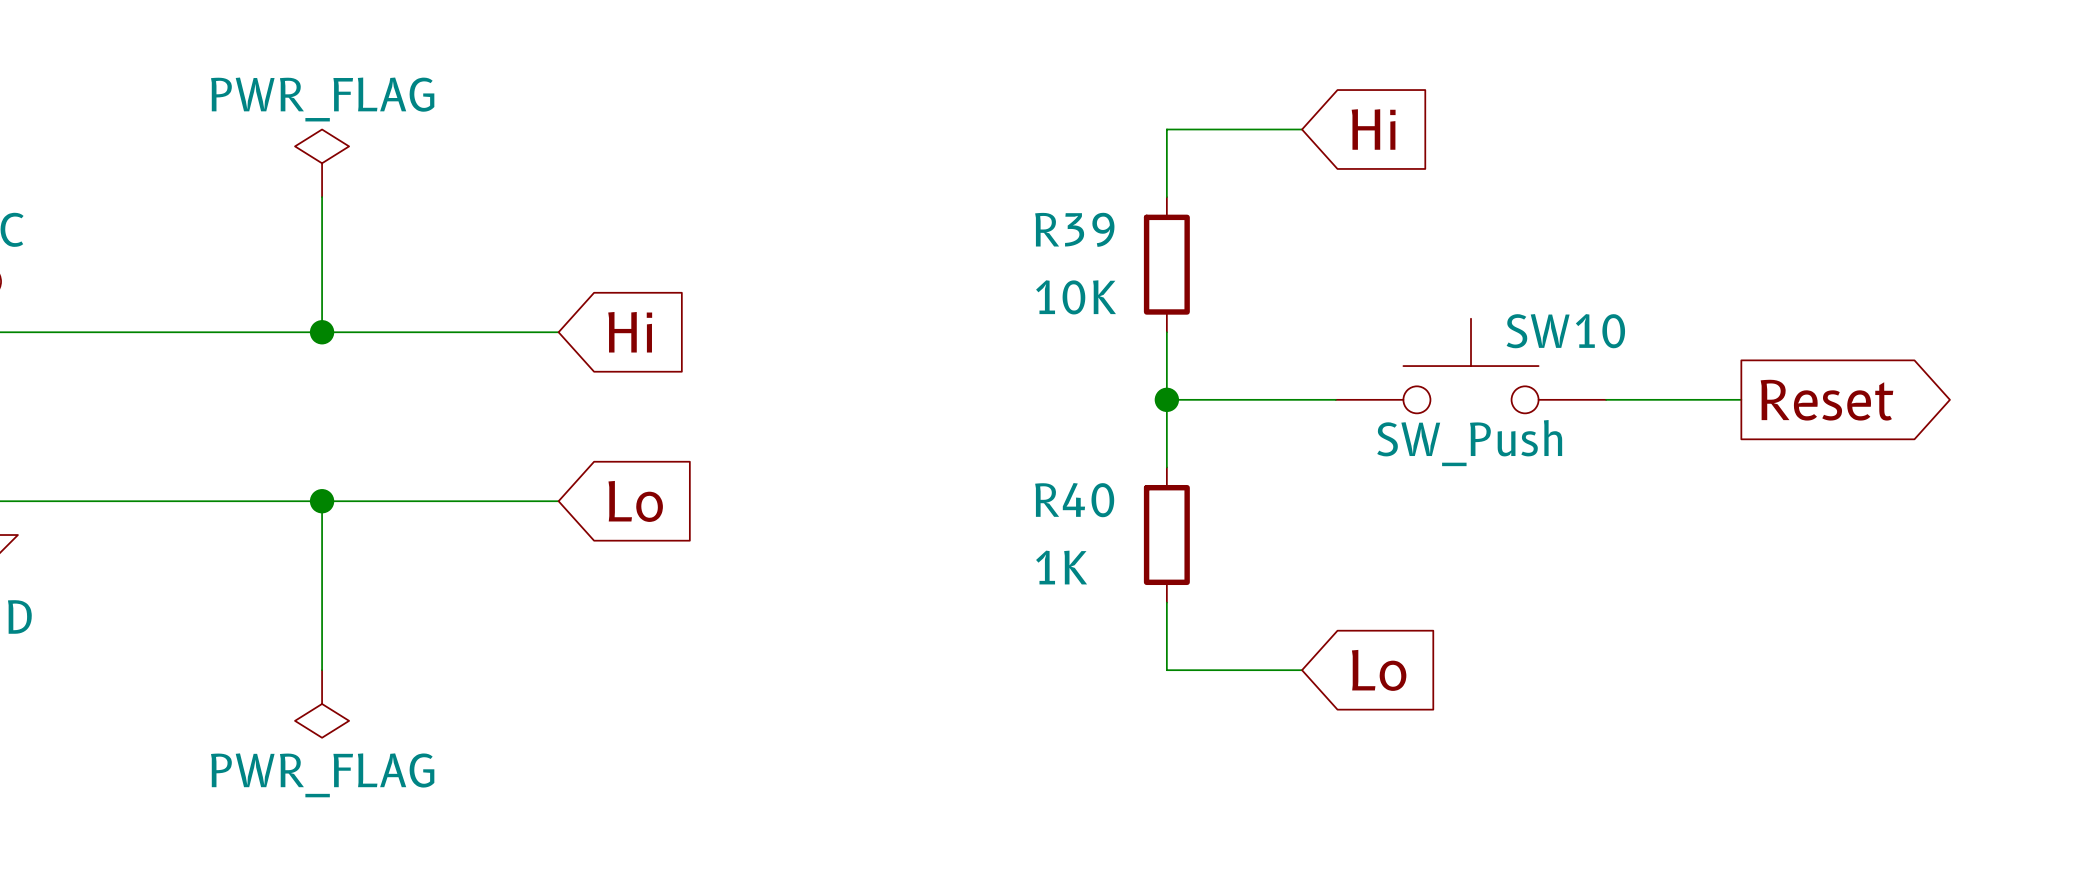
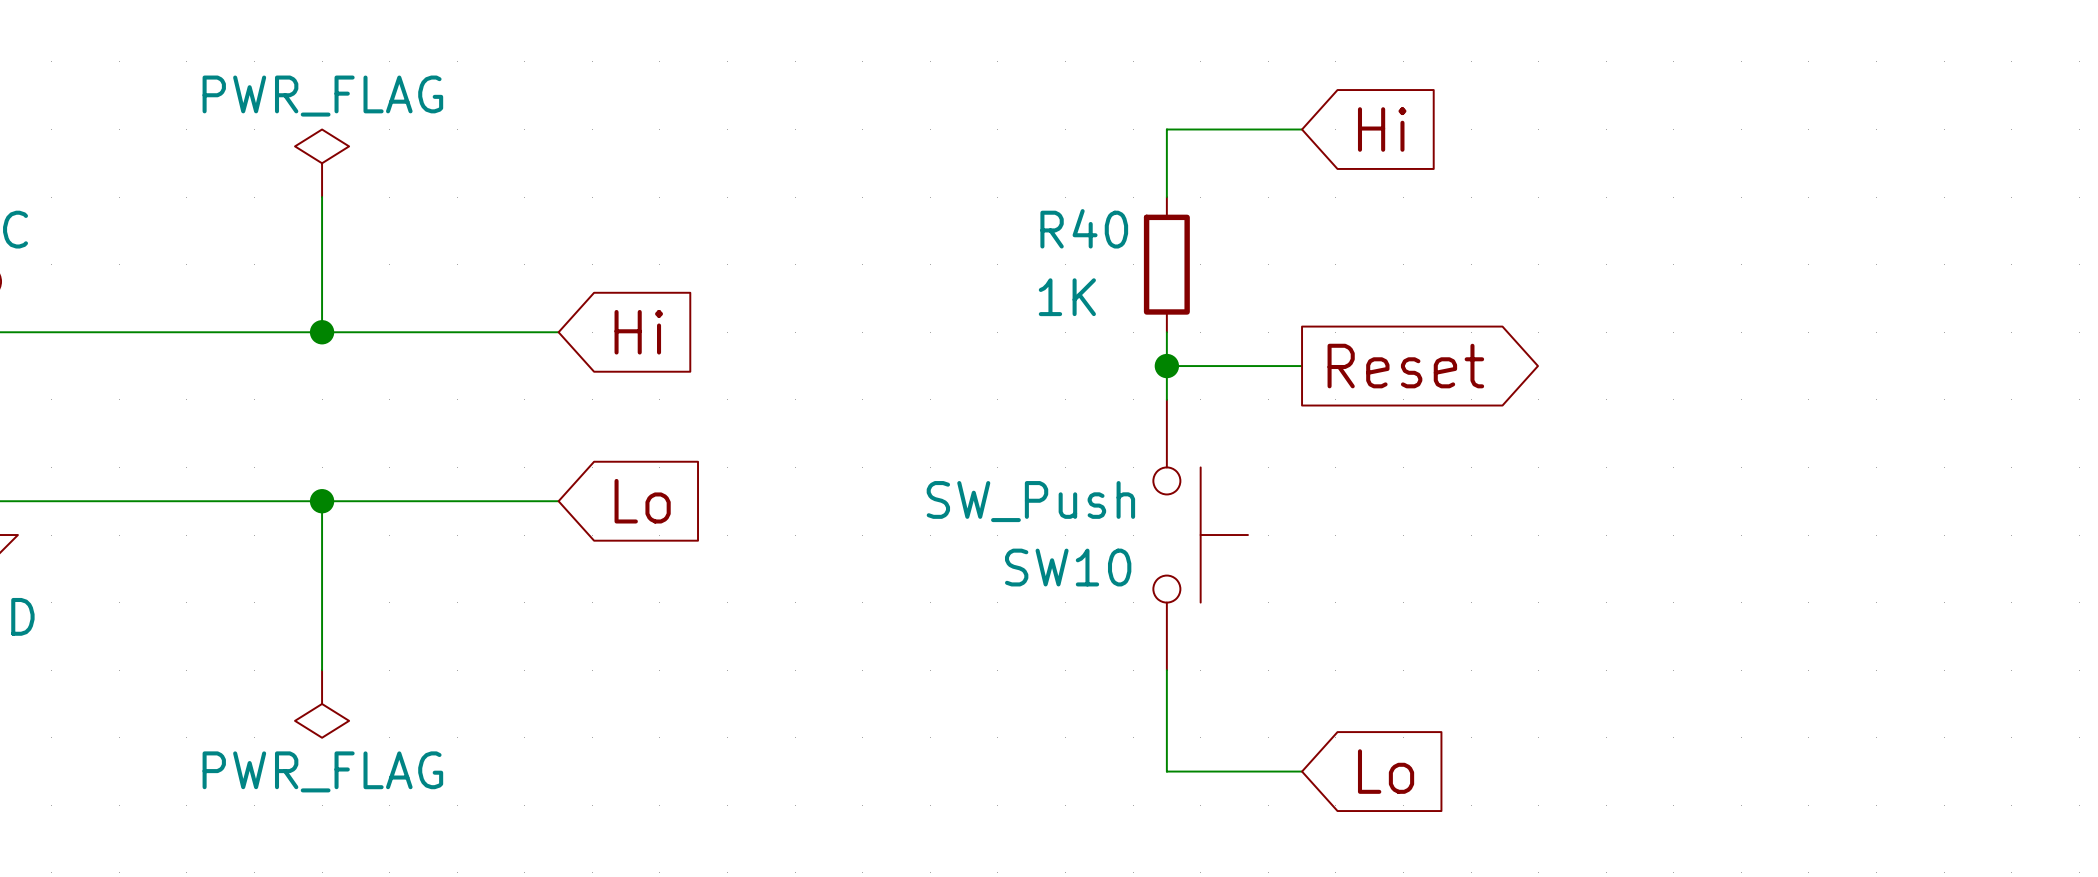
R39 name: R39 (1074, 229) -> R40 (1084, 228)
R39 value: 10K (1076, 297) -> 1K (1067, 297)
SW10 name position: SW10 (1565, 331) -> SW10 (1068, 567)
SW10 rotation: 0° (1471, 366) -> 90° clockwise (1200, 535)
SW10 position: (1471, 366) -> (1200, 535)
junction position: (1166, 399) -> (1166, 366)
wire: (1335, 399) (1166, 399) (1166, 467) -> none
wire: (1606, 399) (1741, 399) -> (1166, 366) (1302, 366)
global label position: Reset (1826, 400) -> Reset (1405, 366)
SW10 value position: SW_Push (1469, 443) -> SW_Push (1030, 501)
R40: 1K (1166, 535) -> none
wire: (1166, 602) (1166, 670) (1302, 670) -> none
wire: none -> (1166, 670) (1166, 771) (1302, 771)
global label position: Lo (1379, 670) -> Lo (1386, 771)

